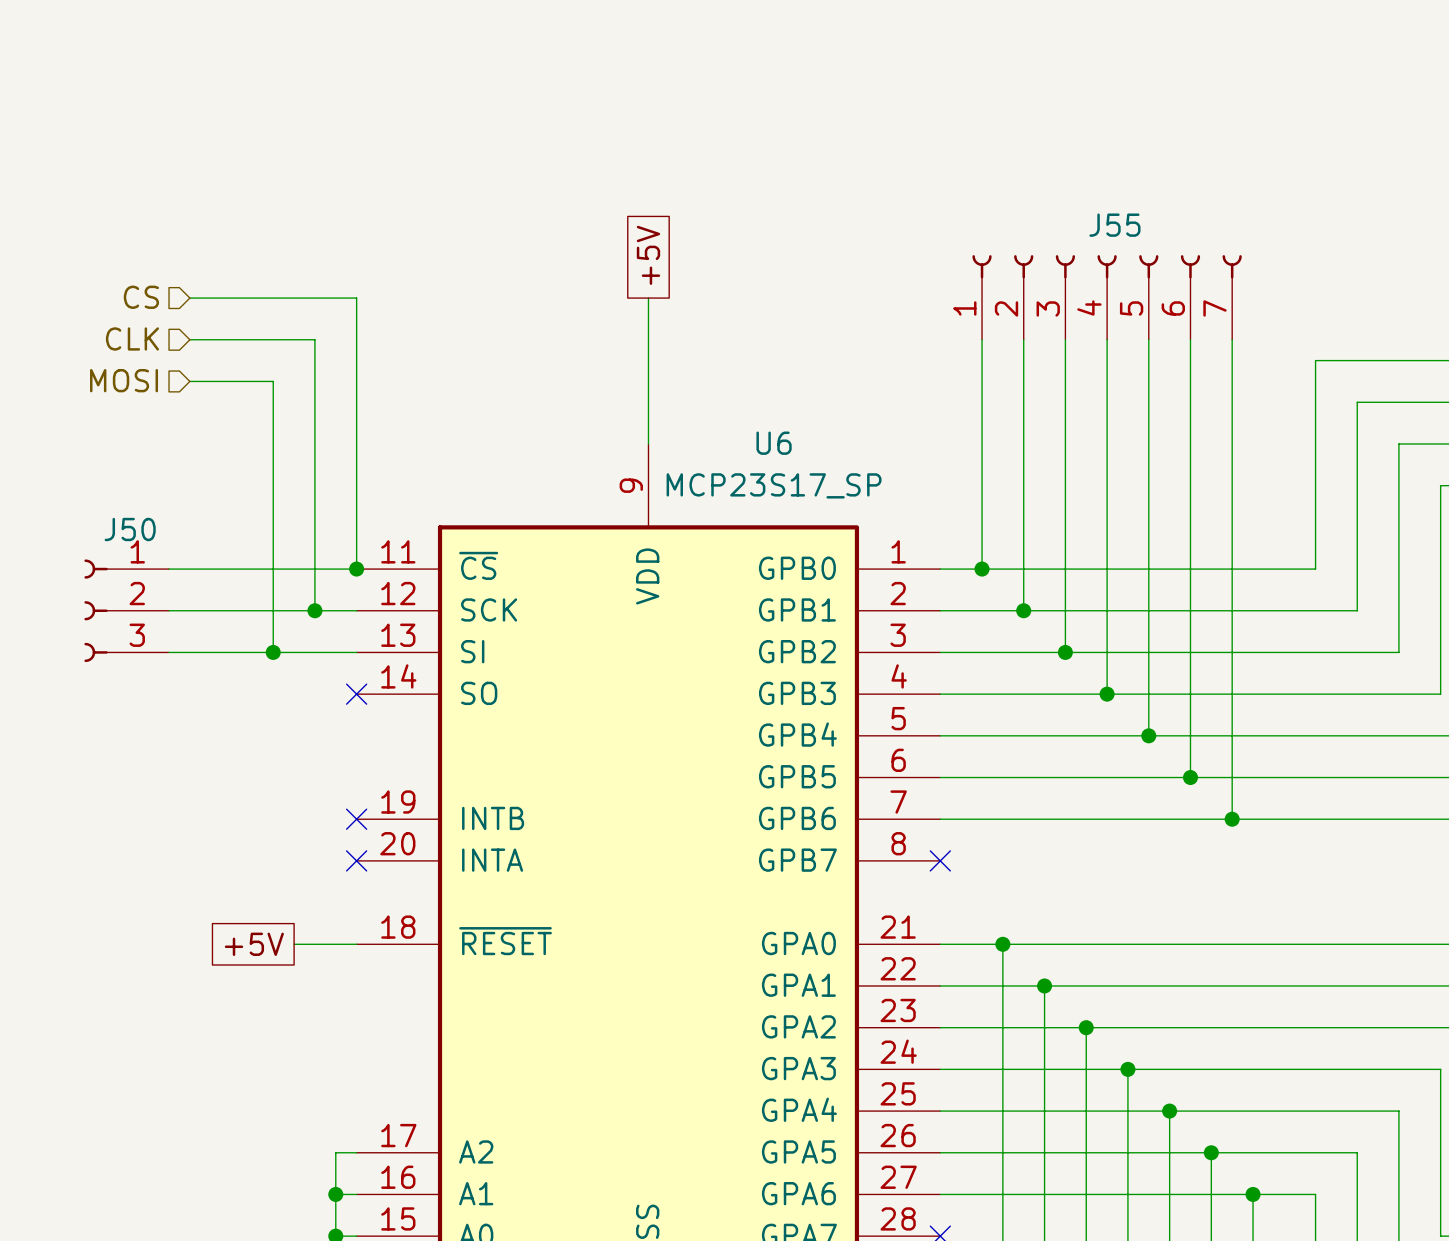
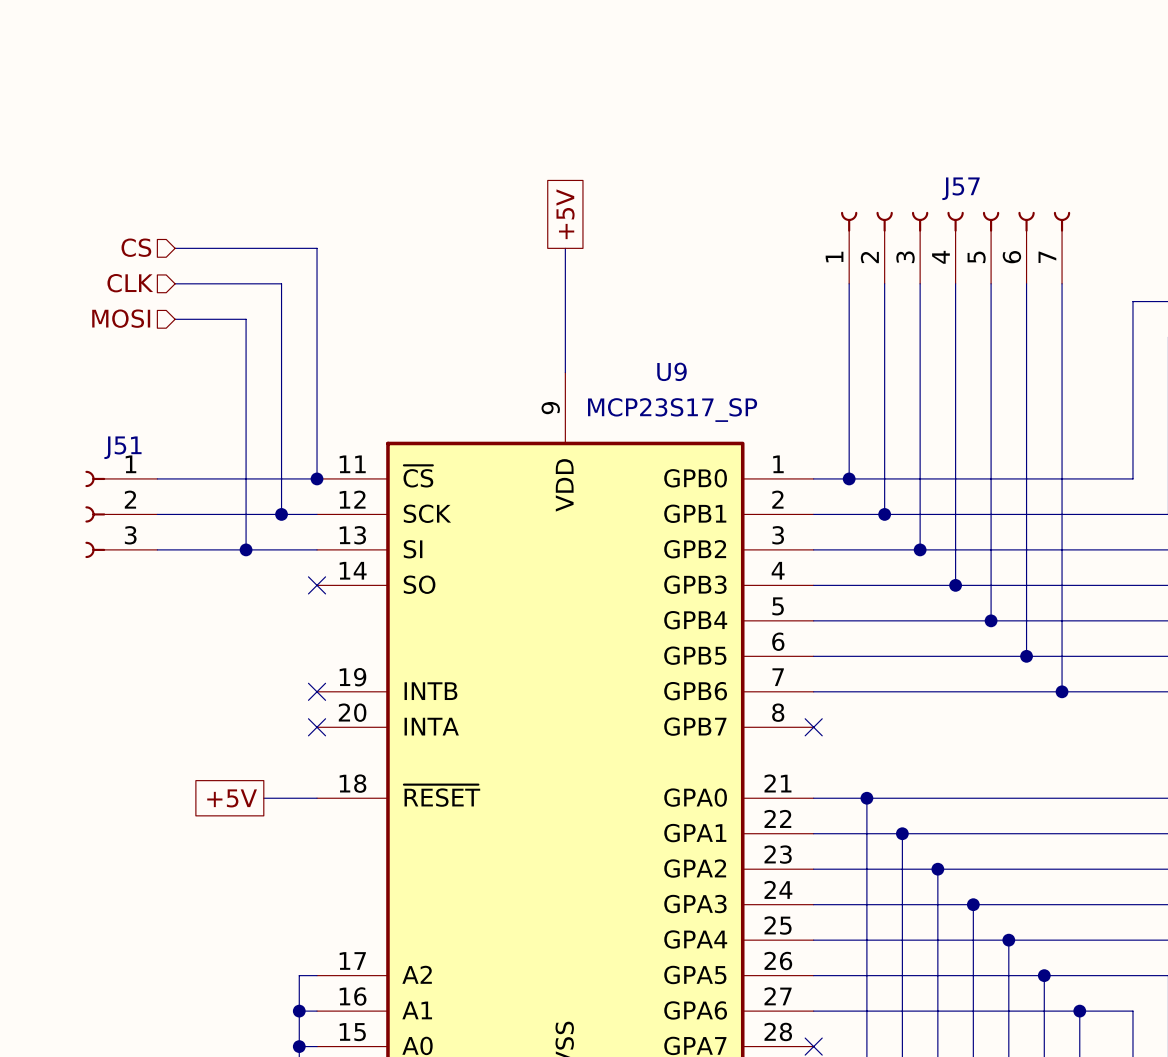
J55 name: J55 (1114, 225) -> J57 (961, 188)
U6 name: U6 (774, 443) -> U9 (671, 371)
J50 name: J50 (130, 529) -> J51 (122, 447)

